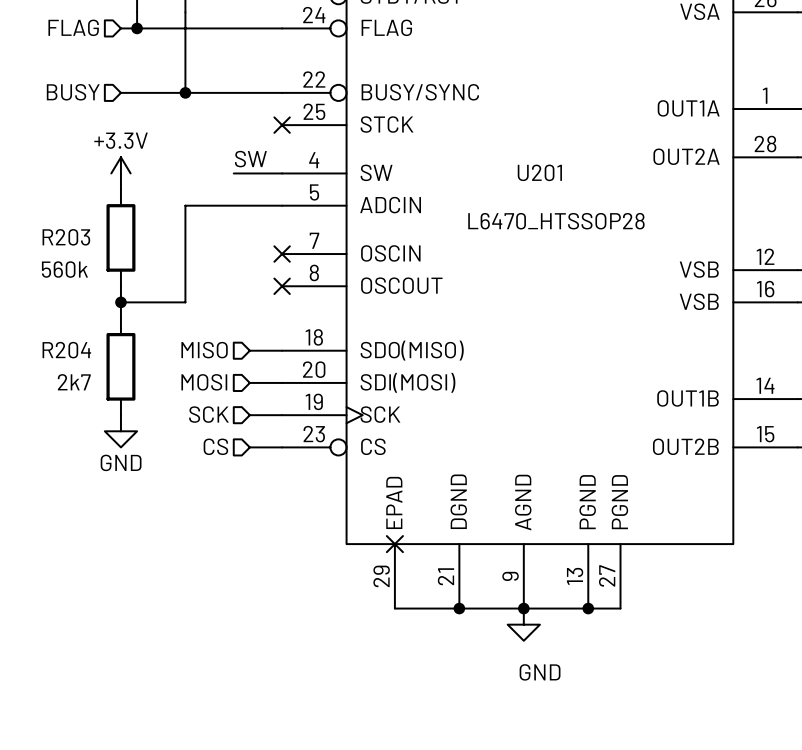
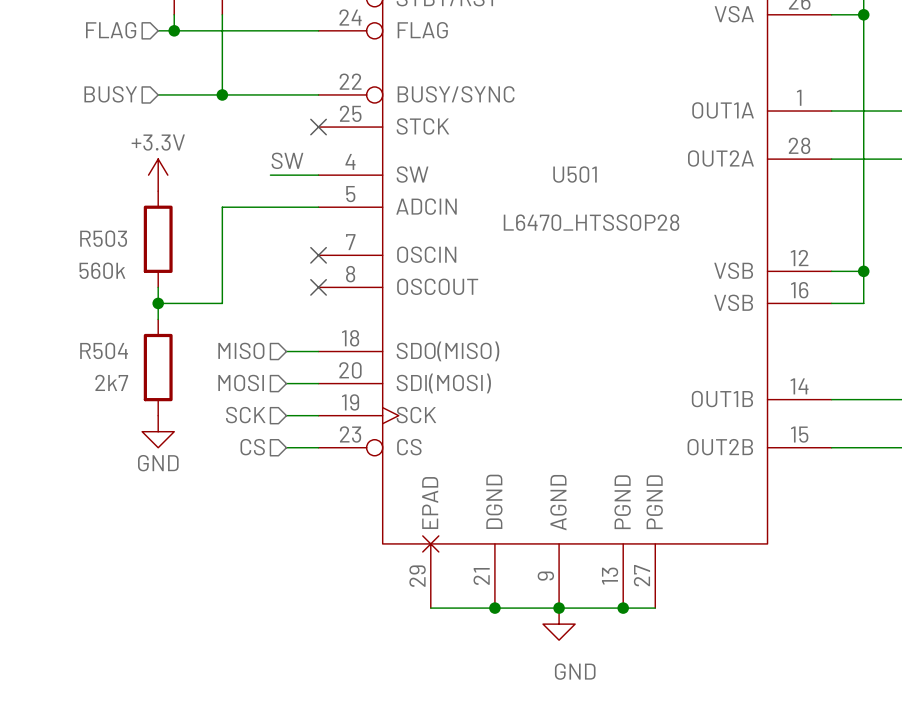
U201 name: U201 (539, 172) -> U501 (575, 174)
R203 name: R203 (66, 237) -> R503 (103, 238)
R204 name: R204 (66, 350) -> R504 (104, 350)

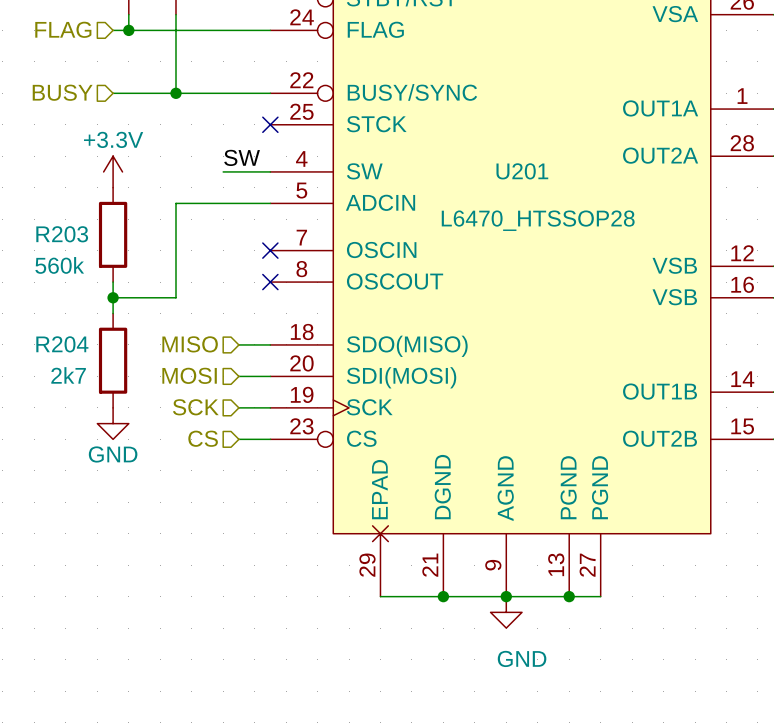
U501 name: U501 (575, 174) -> U201 (522, 171)
R503 name: R503 (103, 238) -> R203 (62, 234)
R504 name: R504 (104, 350) -> R204 (62, 344)

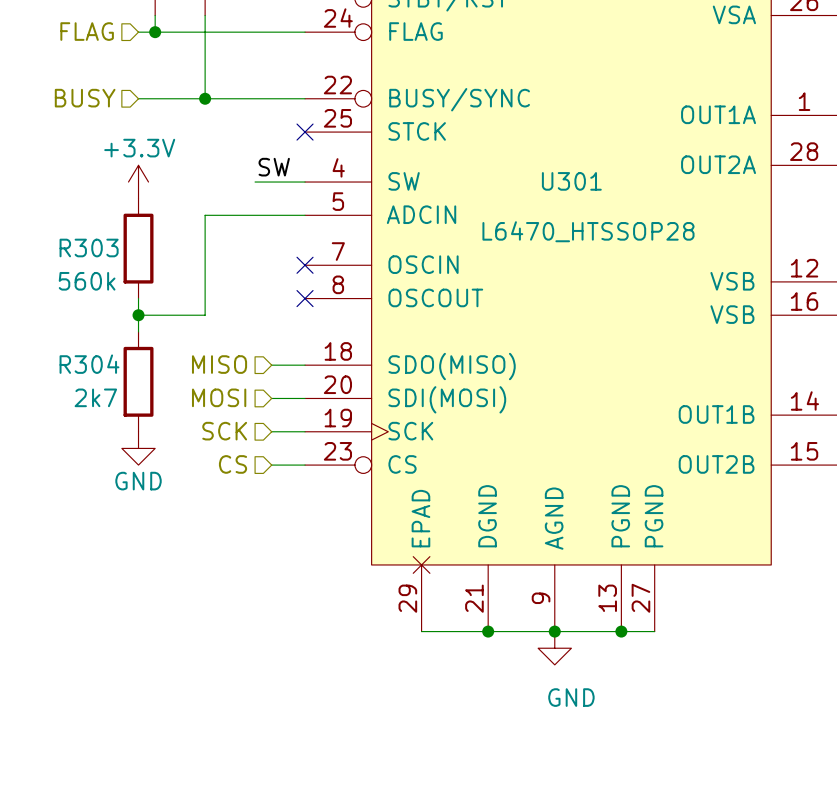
U201 name: U201 (522, 171) -> U301 (571, 181)
R203 name: R203 (62, 234) -> R303 (89, 247)
R204 name: R204 (62, 344) -> R304 (89, 364)

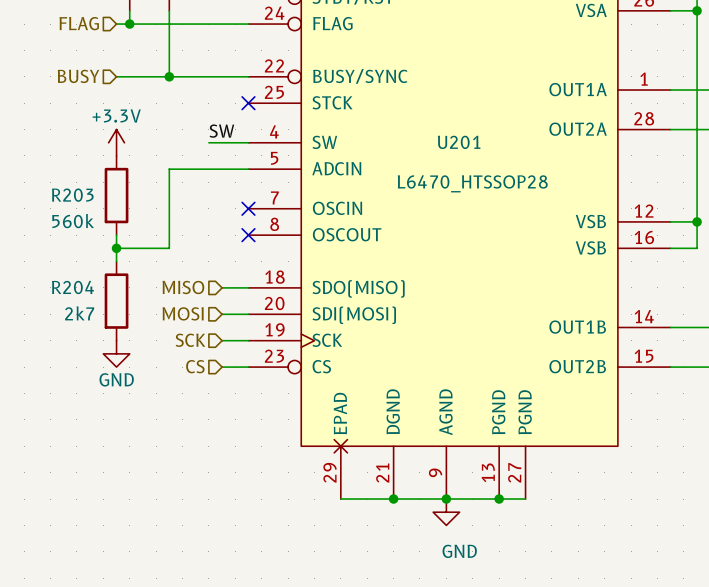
U301 name: U301 (571, 181) -> U201 (459, 142)
R303 name: R303 (89, 247) -> R203 (72, 195)
R304 name: R304 (89, 364) -> R204 (72, 287)

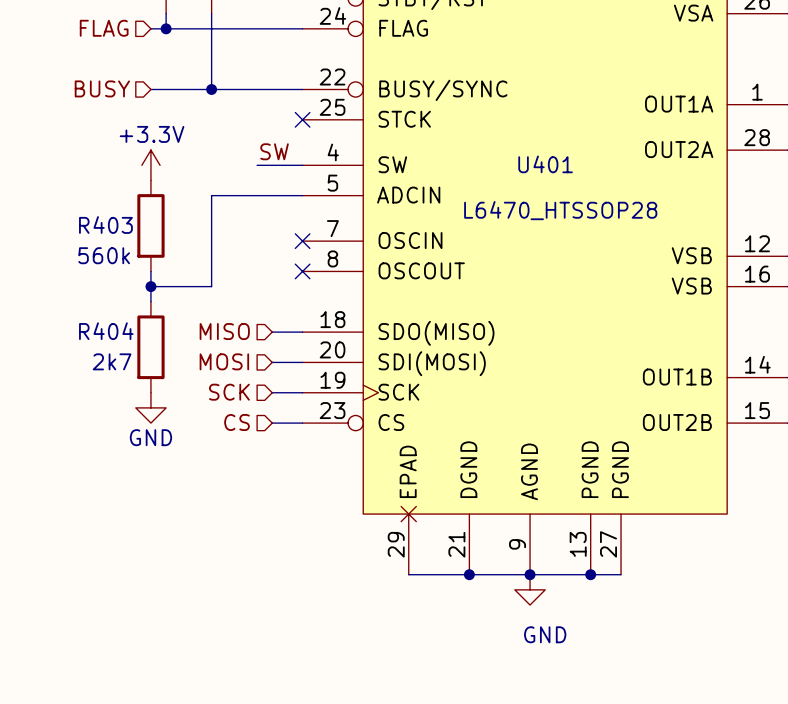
U201 name: U201 (459, 142) -> U401 (545, 164)
R203 name: R203 (72, 195) -> R403 (105, 225)
R204 name: R204 (72, 287) -> R404 (106, 331)

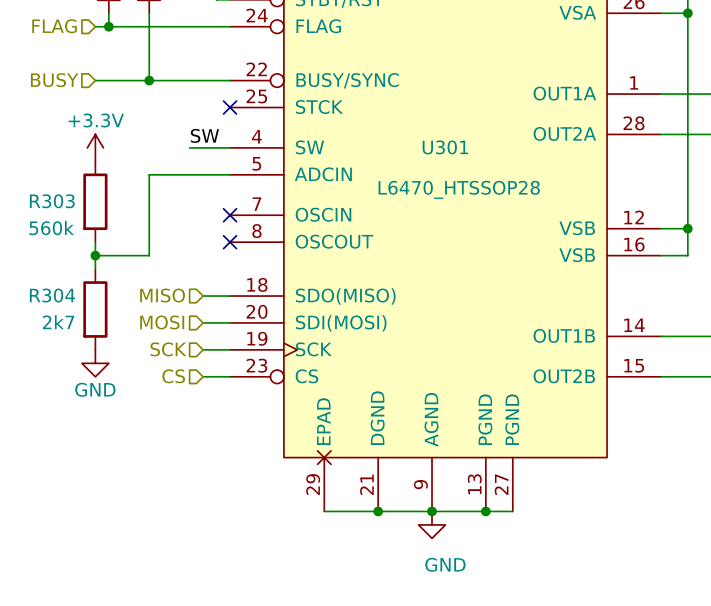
U401 name: U401 (545, 164) -> U301 (445, 147)
R403 name: R403 (105, 225) -> R303 (52, 201)
R404 name: R404 (106, 331) -> R304 (52, 295)

